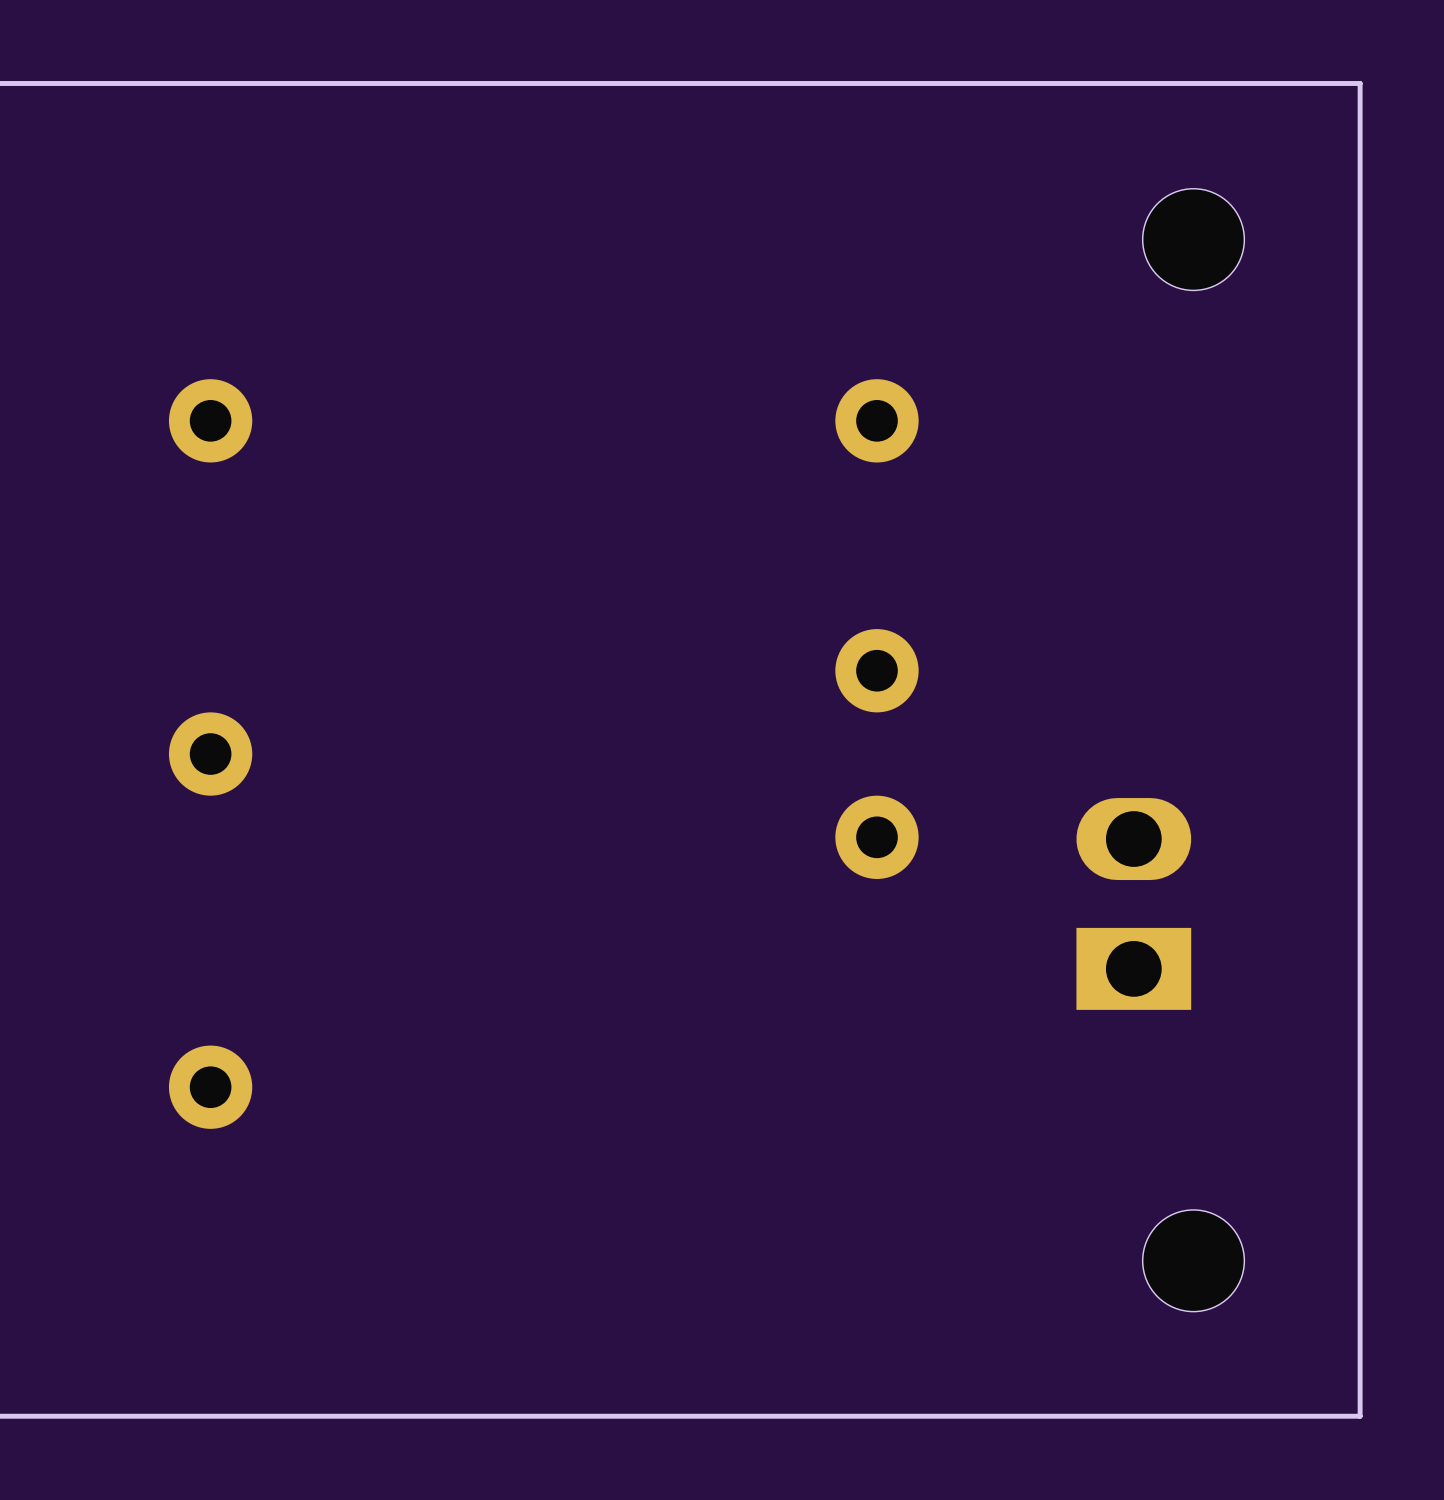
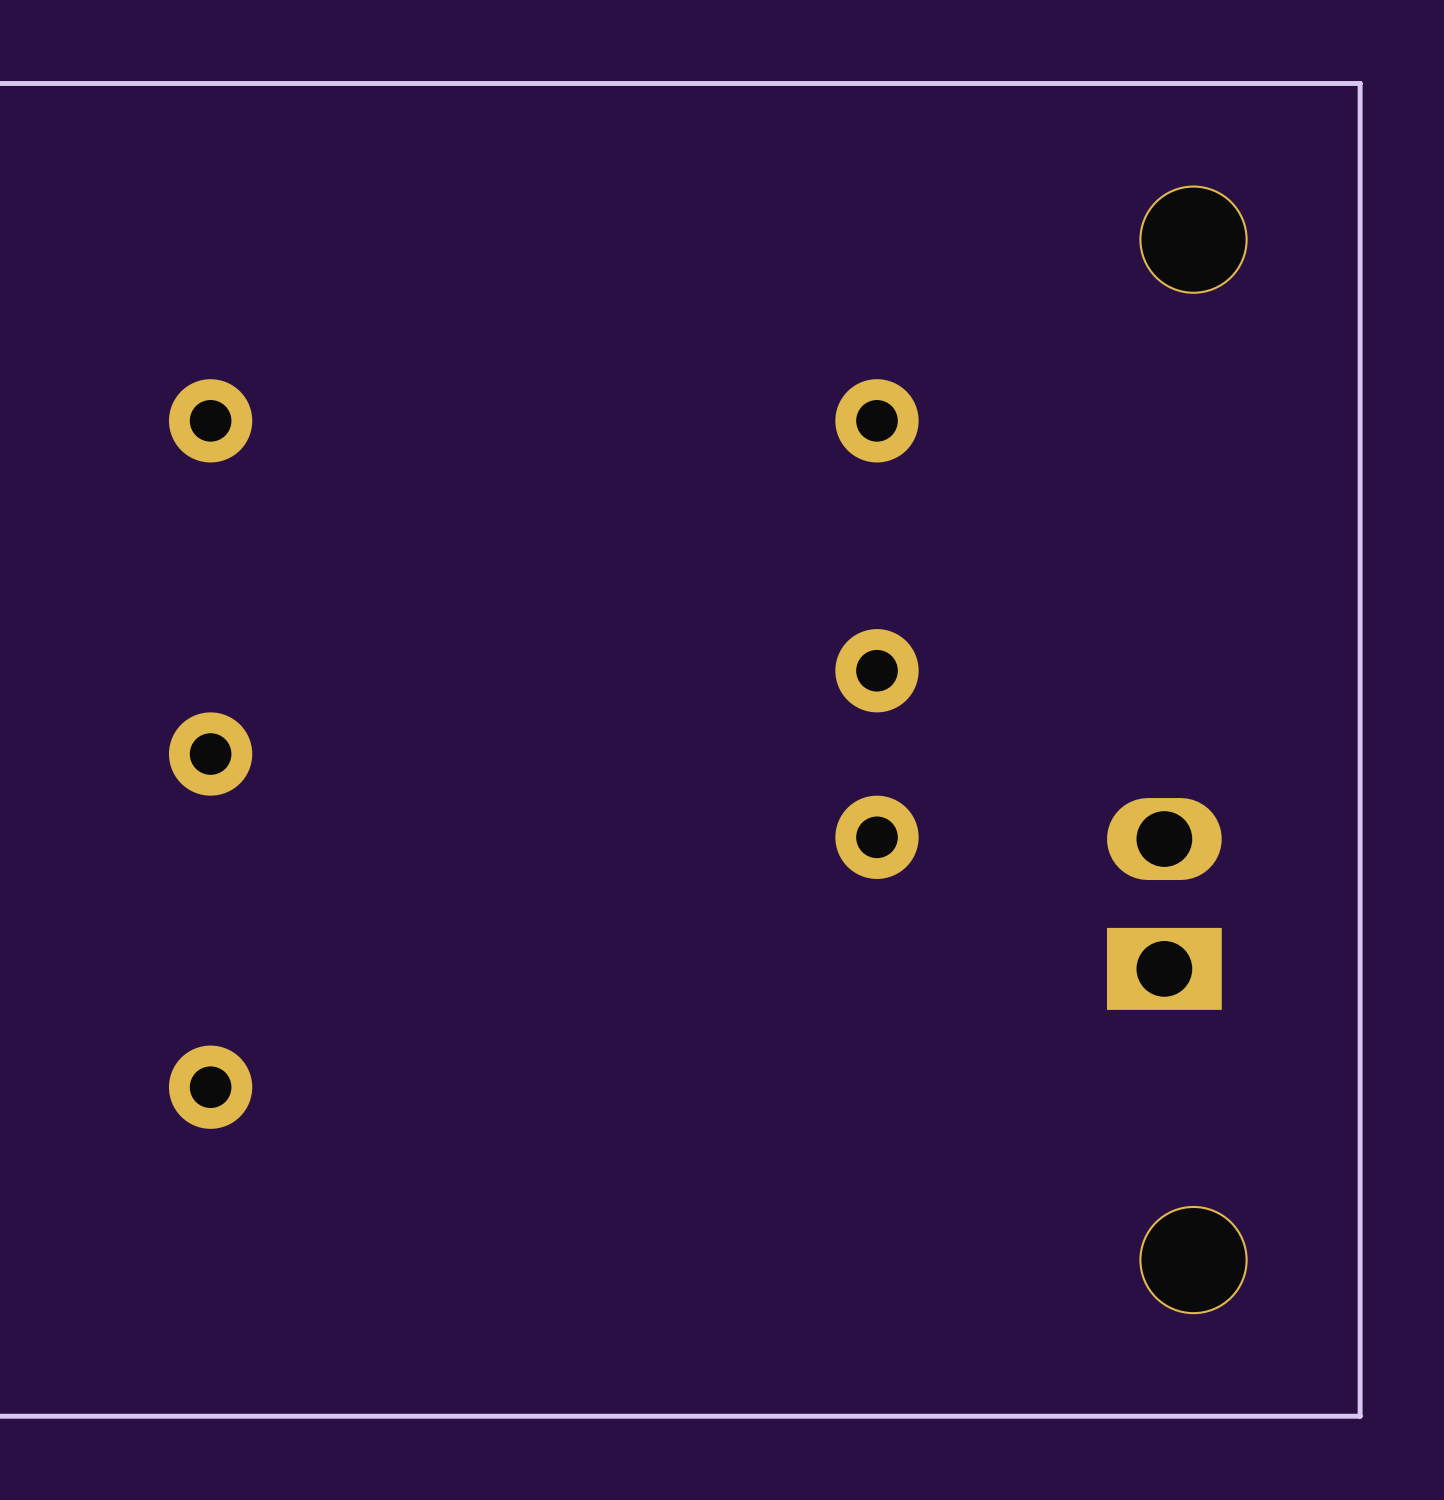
part footprint: [1142, 188, 1245, 291] -> [1139, 185, 1248, 294]
part position: (1133, 903) -> (1164, 903)
part footprint: [1142, 1209, 1245, 1312] -> [1139, 1205, 1248, 1315]

